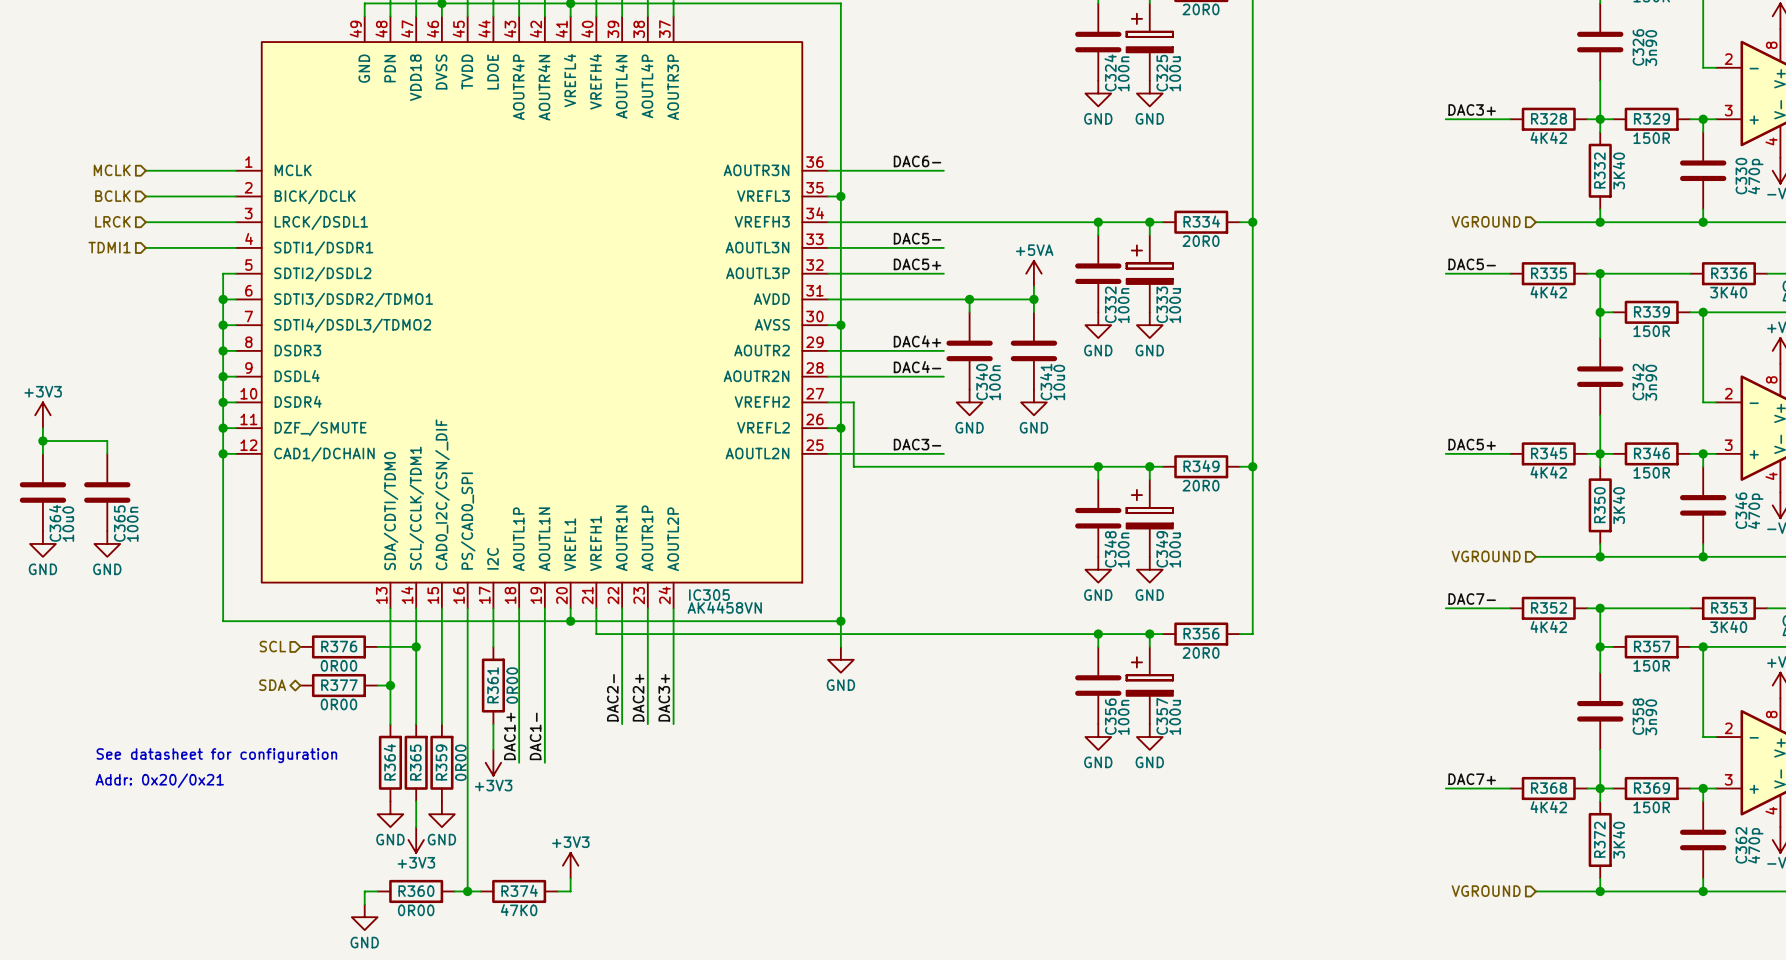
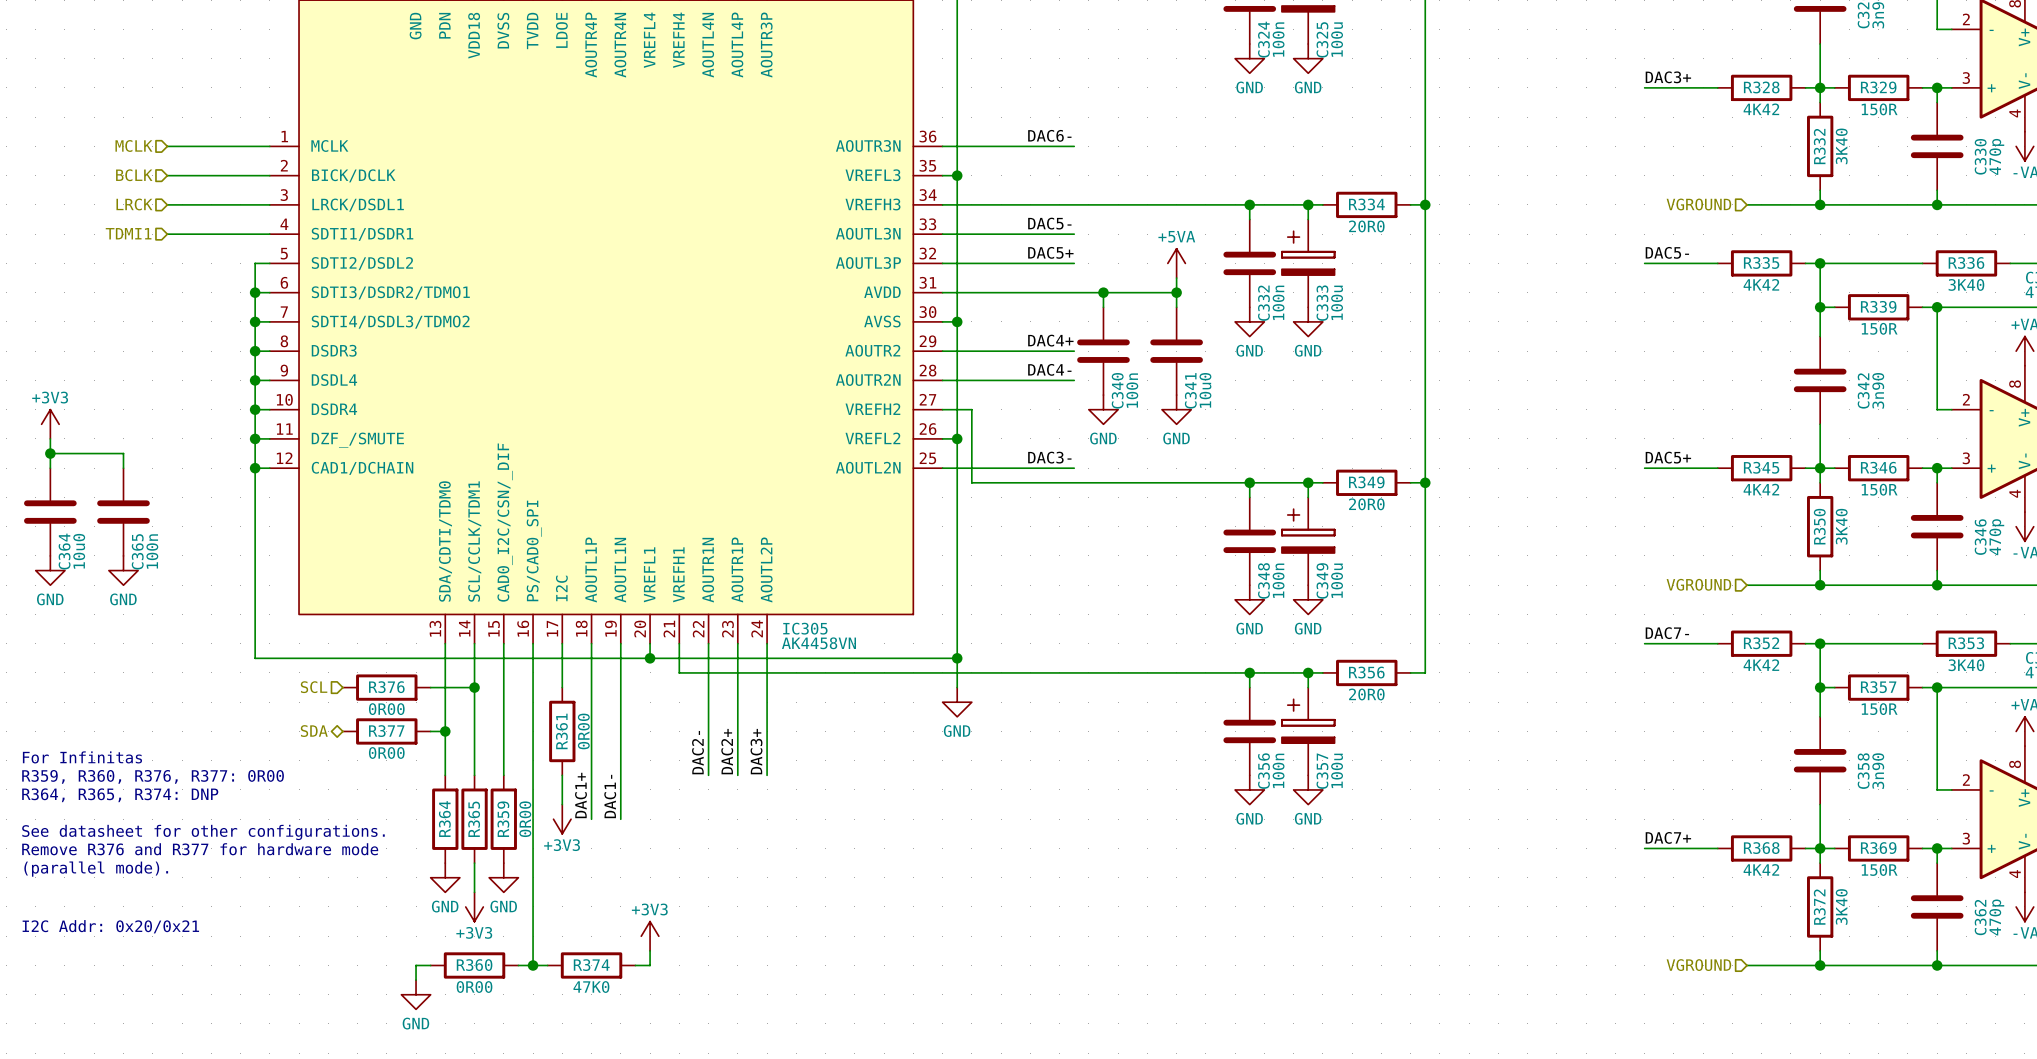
text: none -> For Infinitas (82, 757)
text: none -> R359, R360, R376, R377: 0R00 (153, 776)
text: none -> R364, R365, R374: DNP (120, 795)
text: See datasheet for configuration (216, 755) -> See datasheet for other configurations. (203, 832)
text: Addr: 0x20/0x21 (159, 780) -> none
text: none -> Remove R376 and R377 for hardware mode (200, 849)
text: none -> (parallel mode). (96, 869)
text: none -> I2C Addr: 0x20/0x21 (110, 926)

